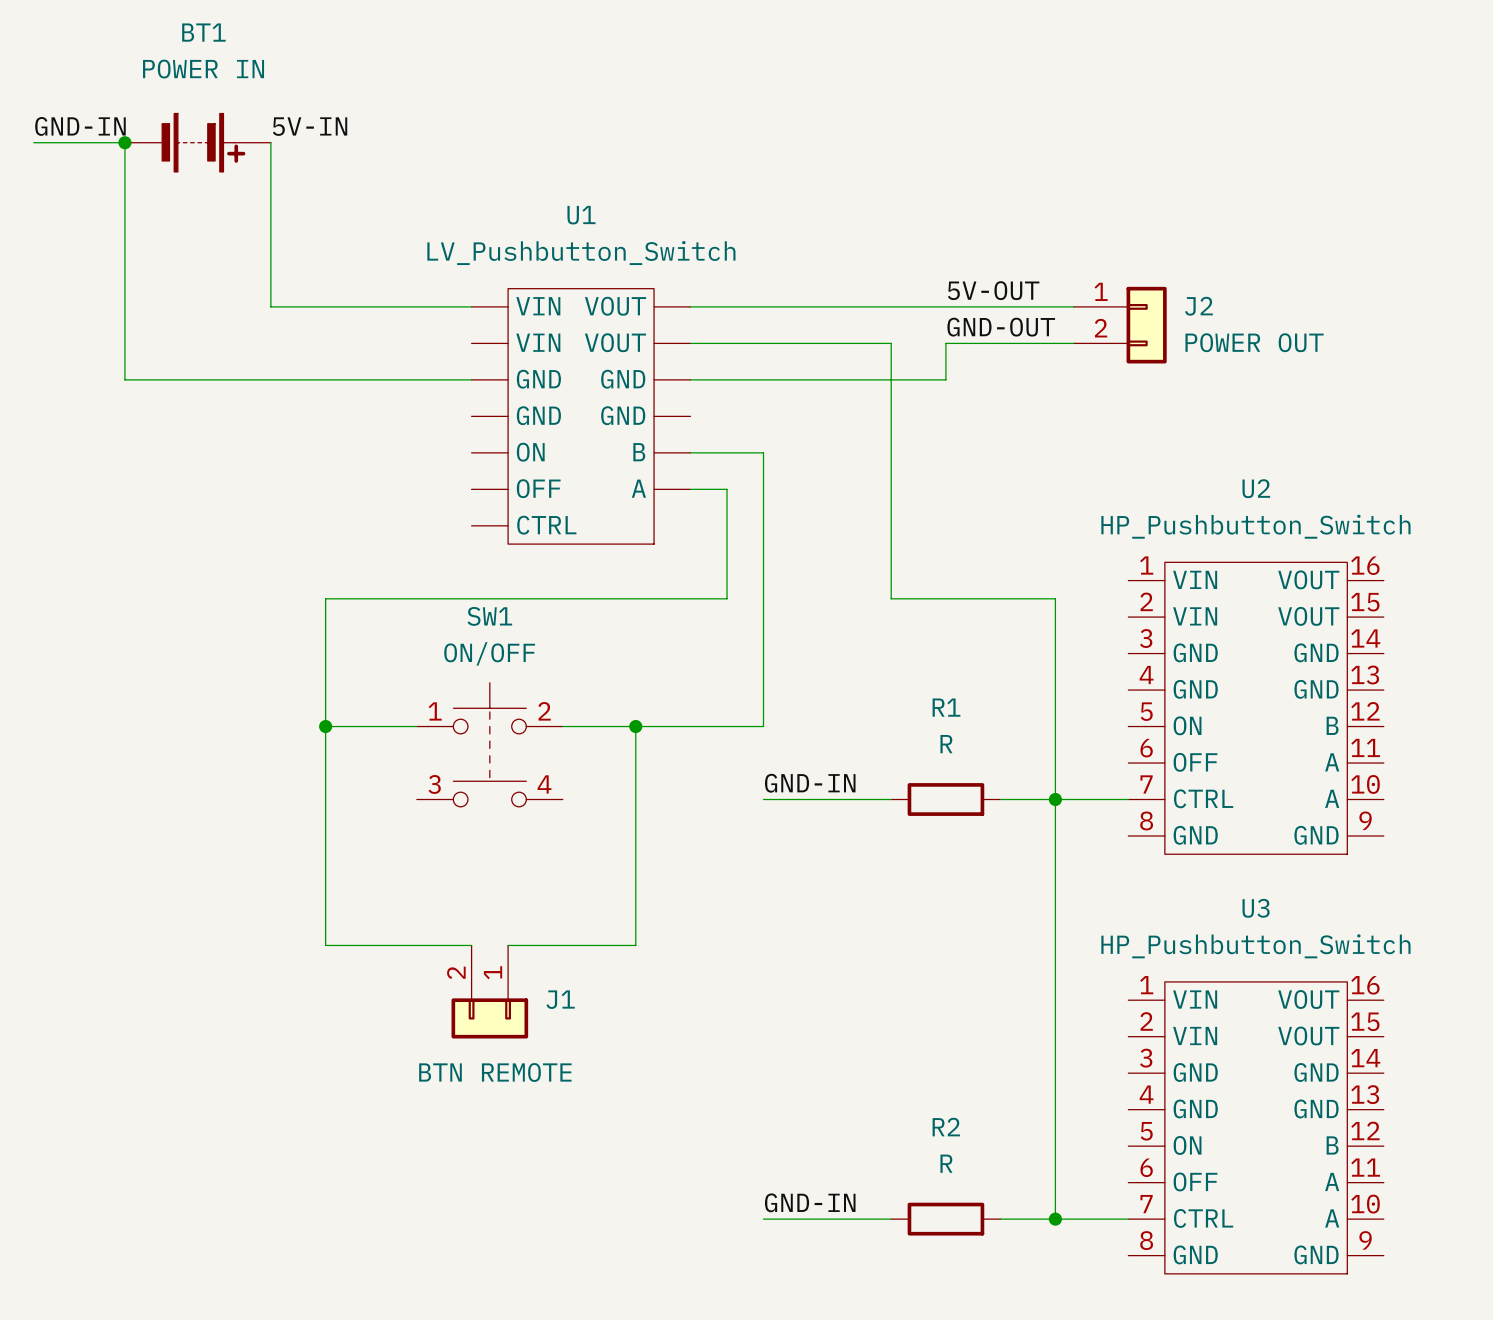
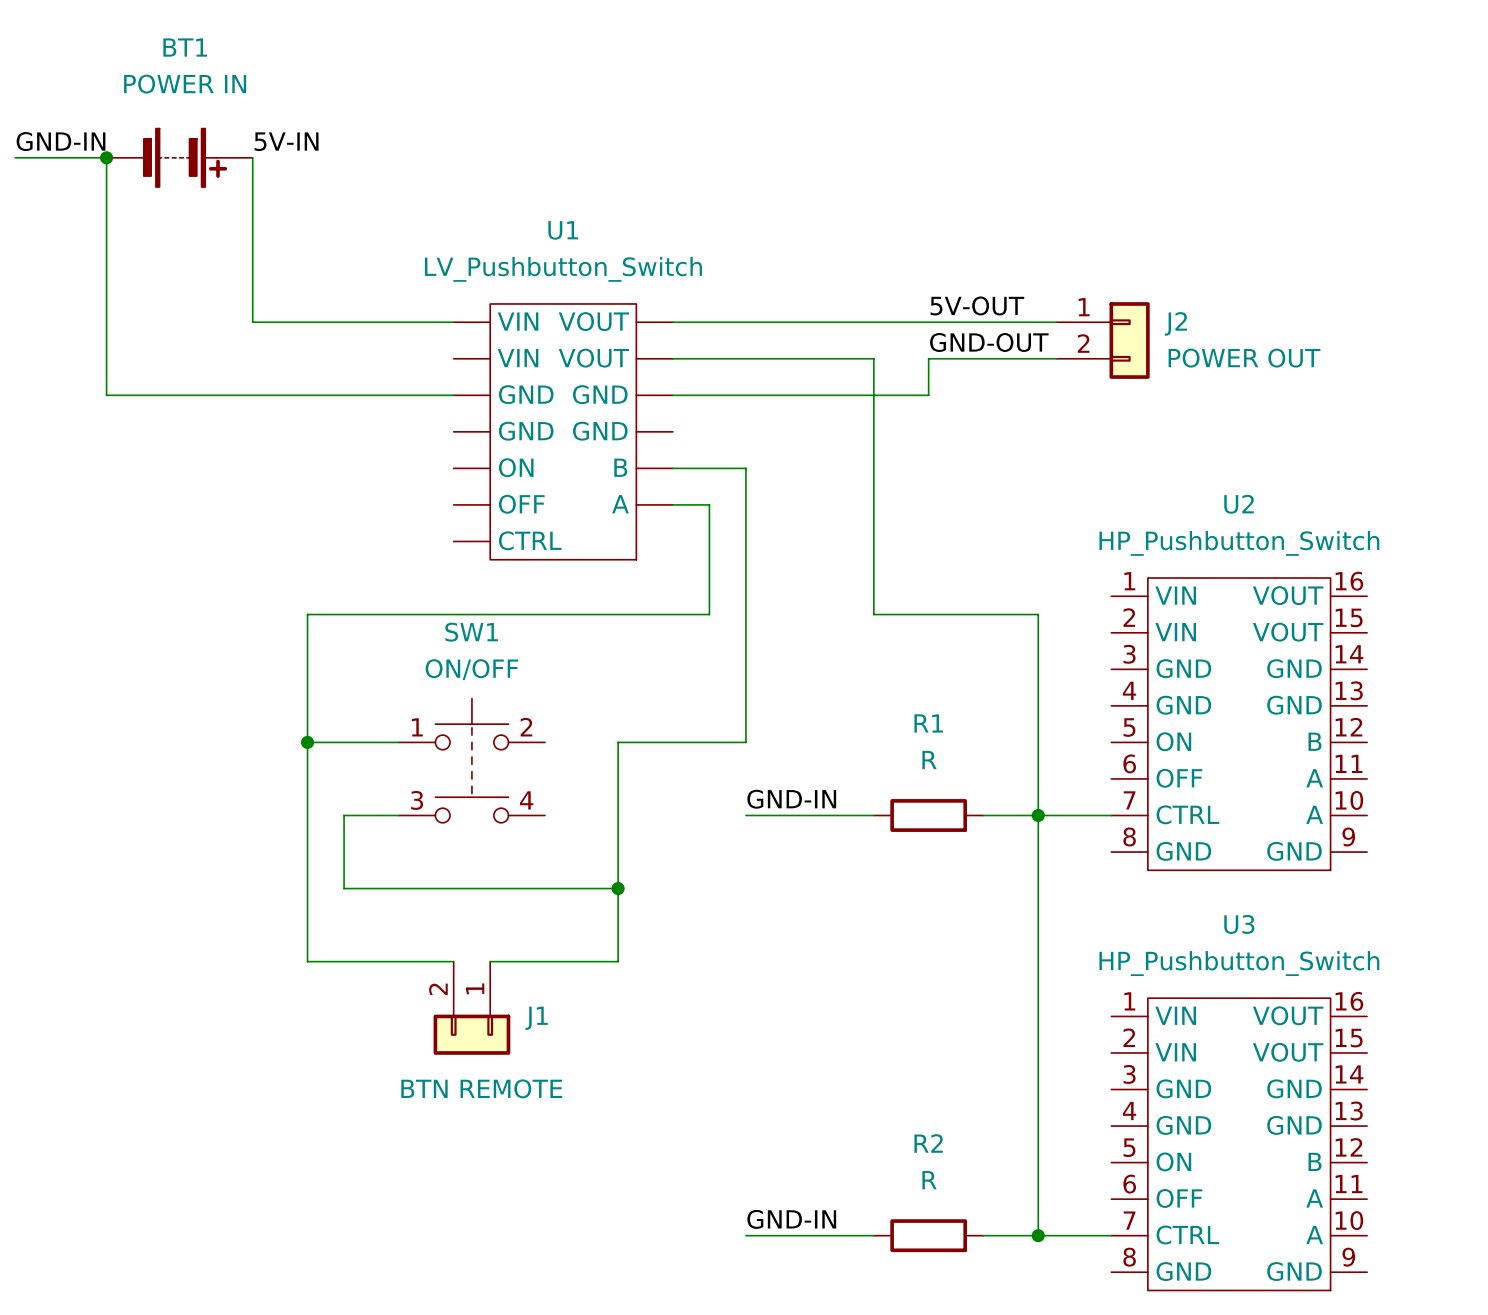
wire: (562, 726) (635, 726) -> none
junction: (635, 726) -> none
wire: none -> (398, 815) (344, 815) (344, 888) (618, 888)
junction: none -> (618, 888)

